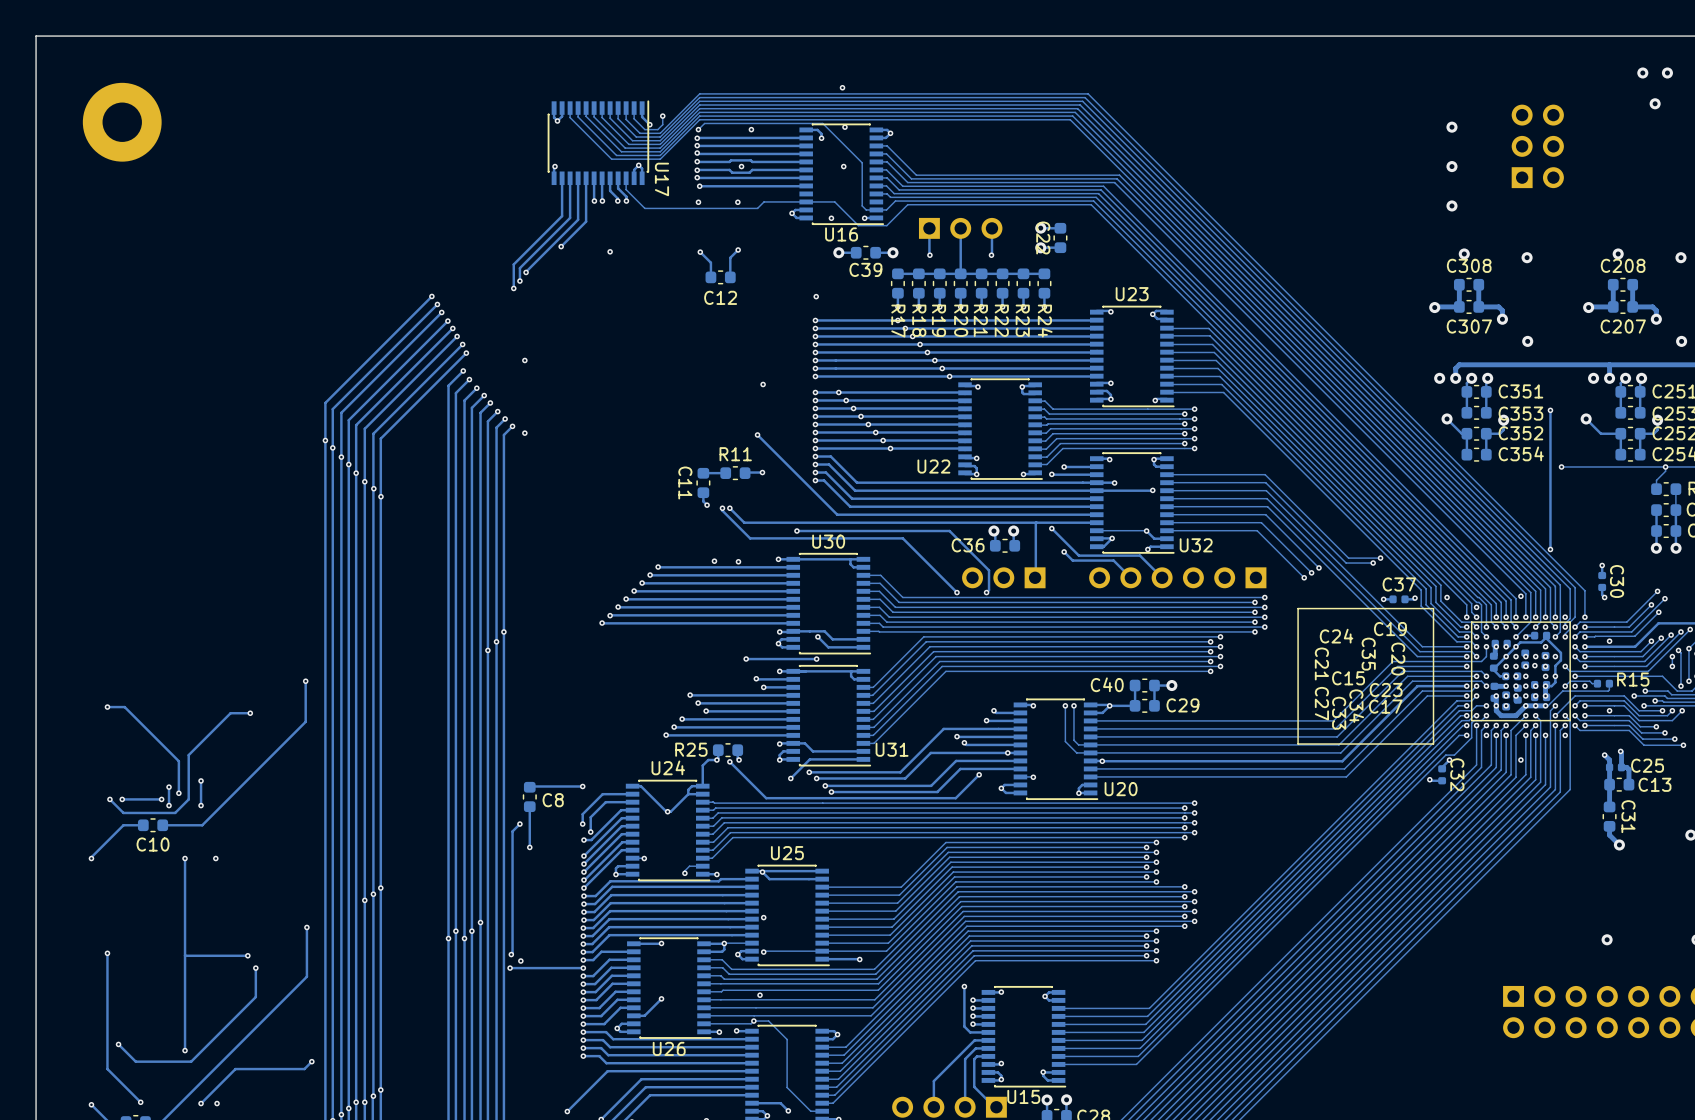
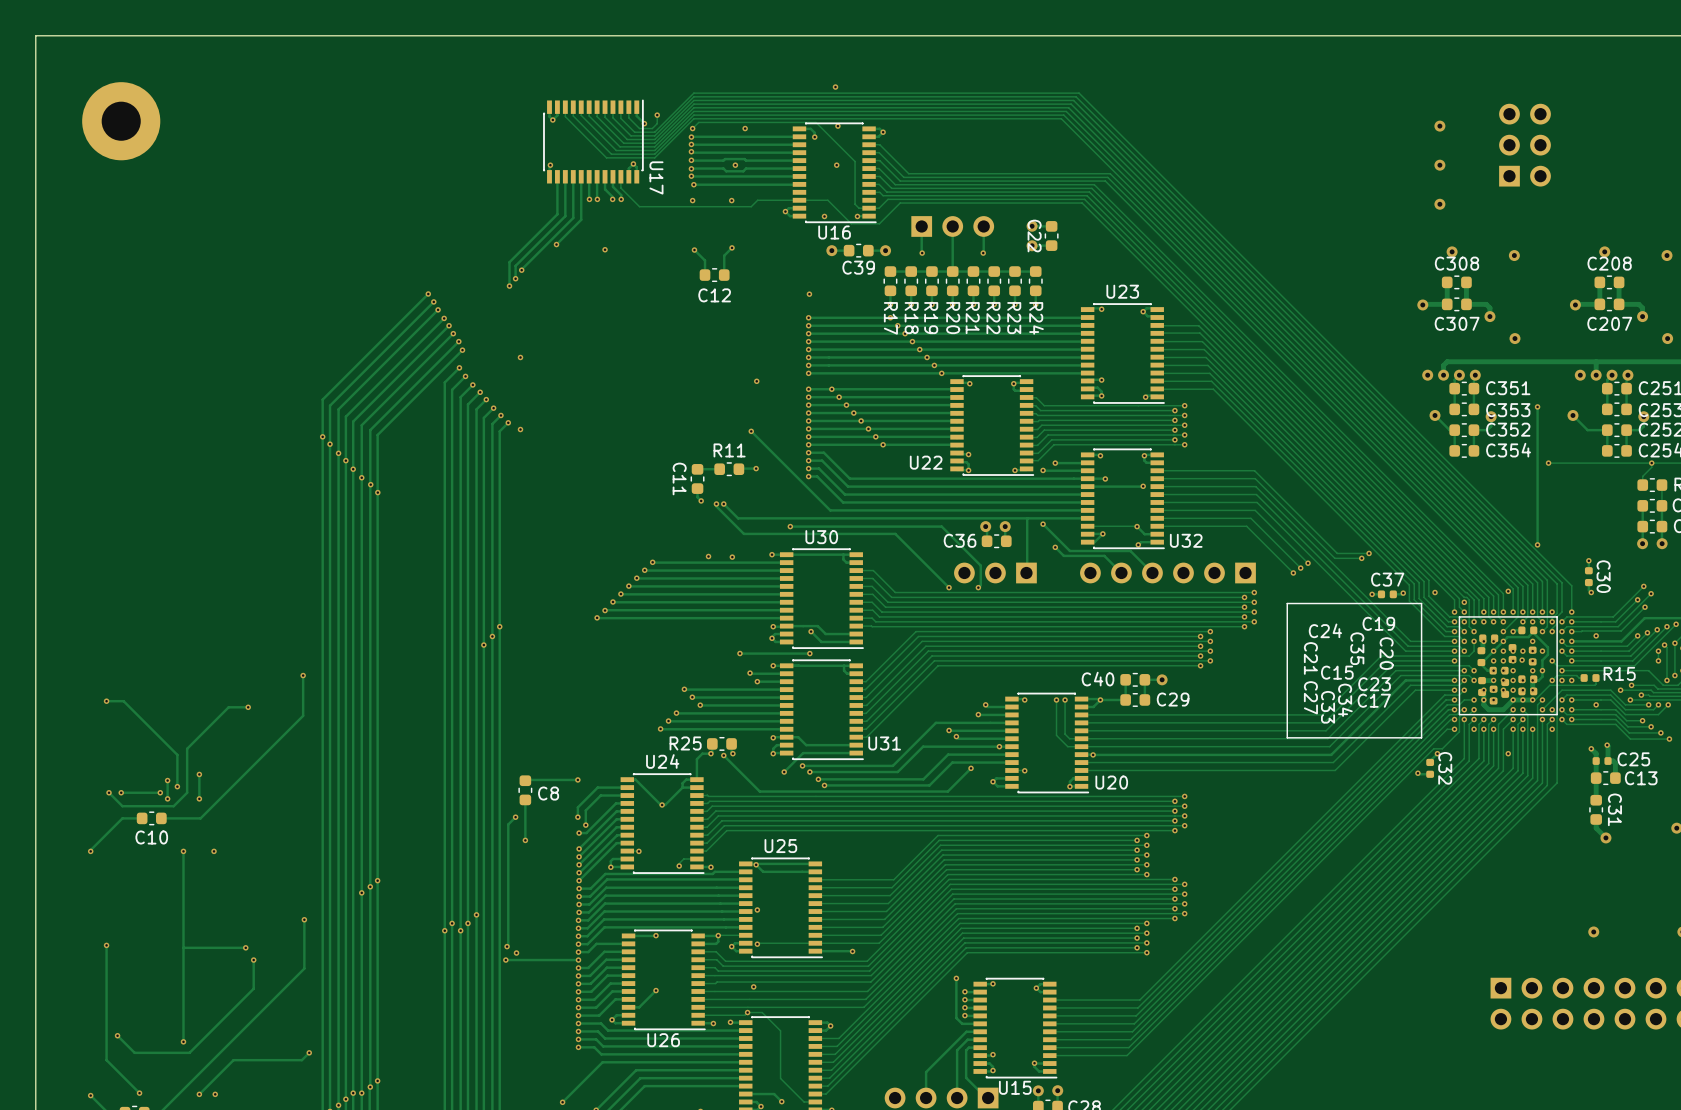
via: (1642, 72) -> none
via: (1667, 72) -> none
via: (1655, 103) -> none

